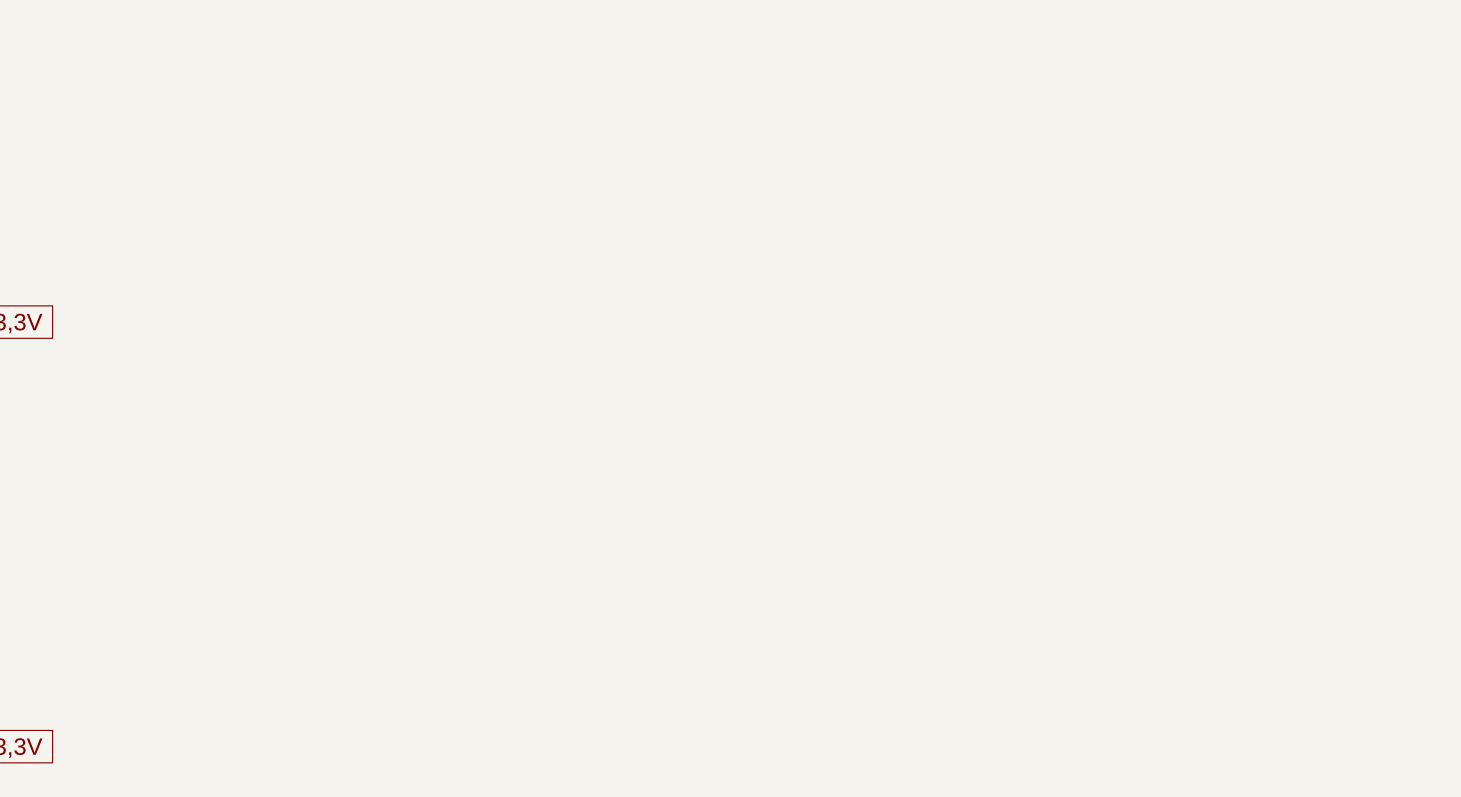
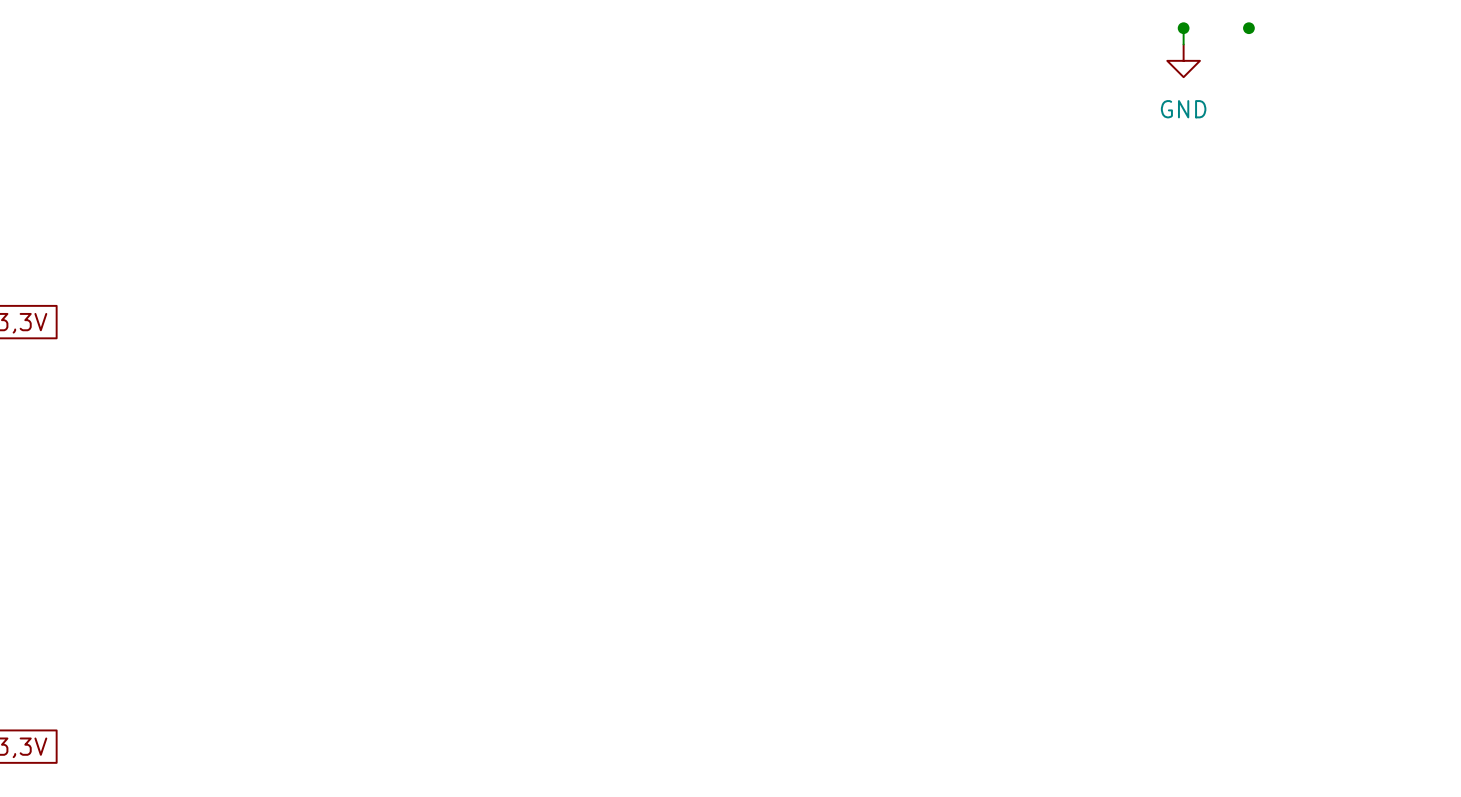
wire: none -> (1183, 28) (1183, 44)
junction: none -> (1183, 28)
junction: none -> (1248, 28)
power symbol: none -> GND (1183, 60)

